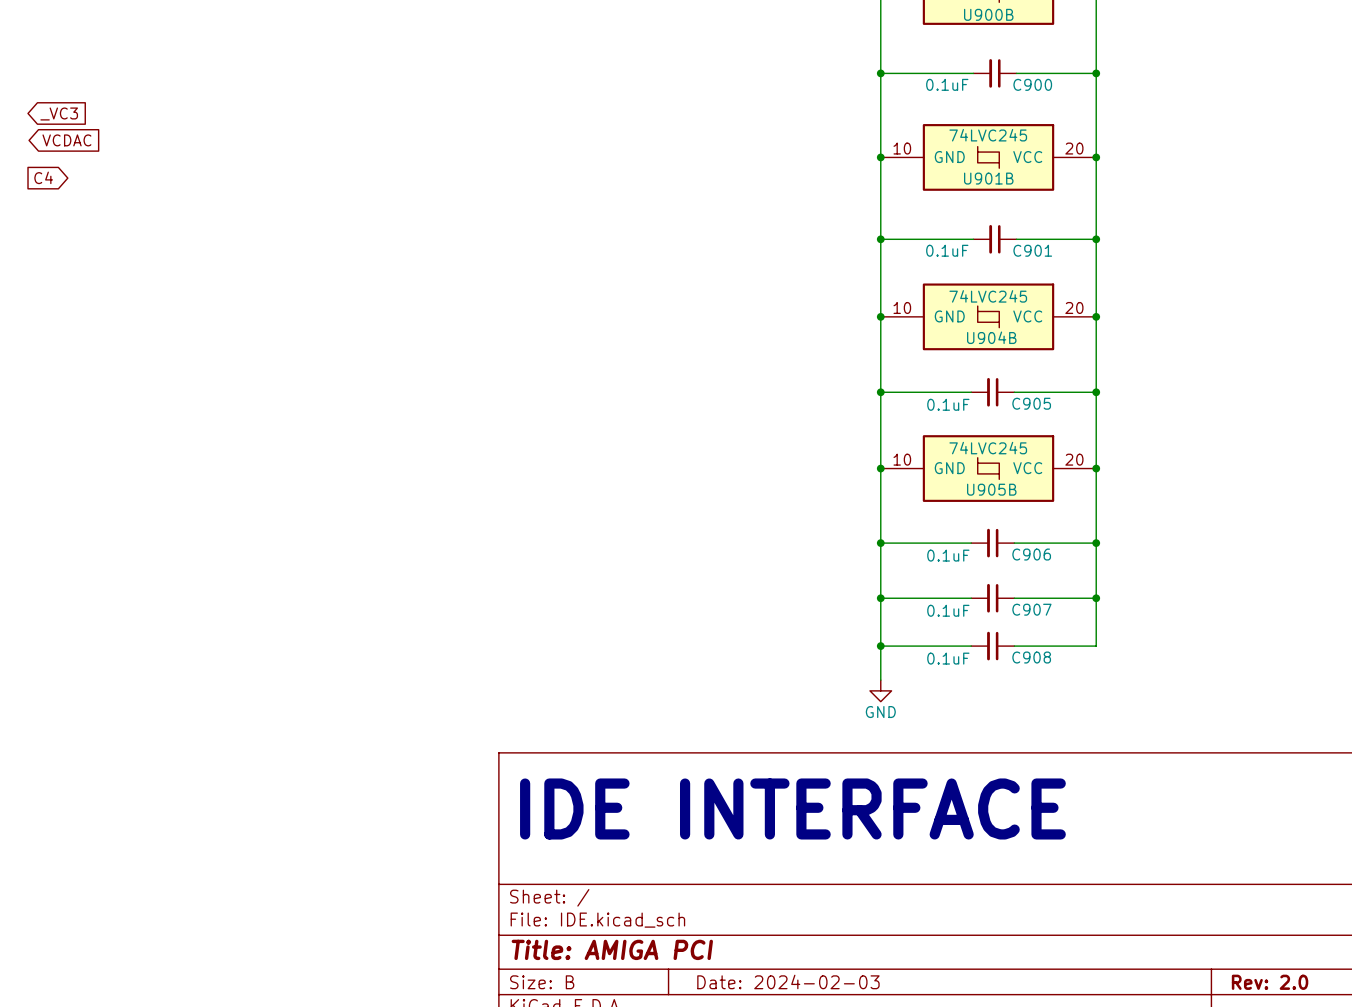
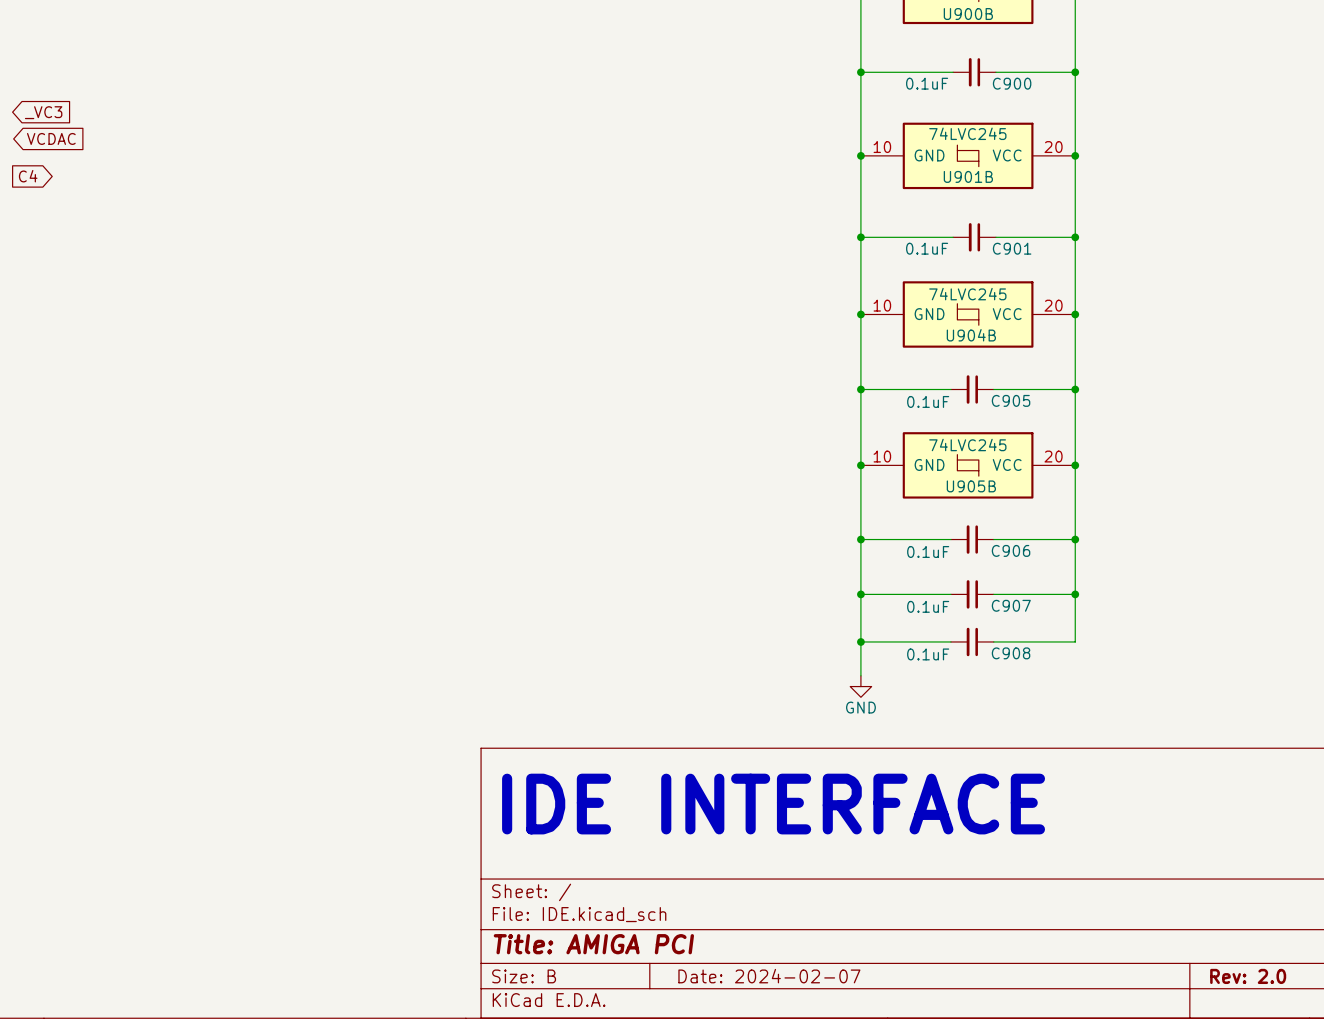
title block: Date: 2024-02-03 (788, 981) -> Date: 2024-02-07 (769, 976)

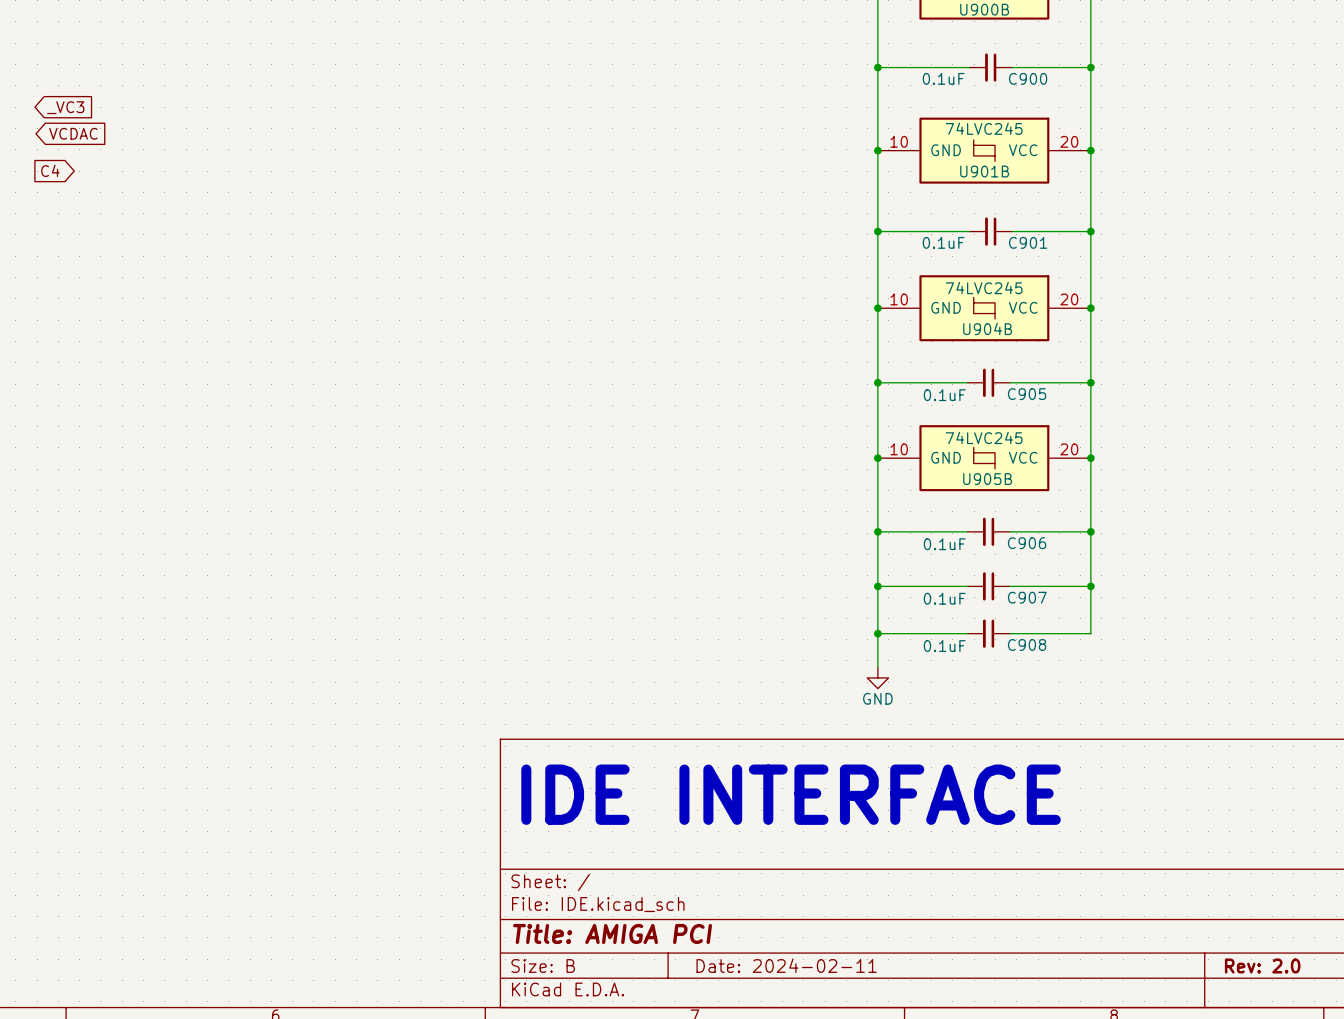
title block: Date: 2024-02-07 (769, 976) -> Date: 2024-02-11 (786, 965)

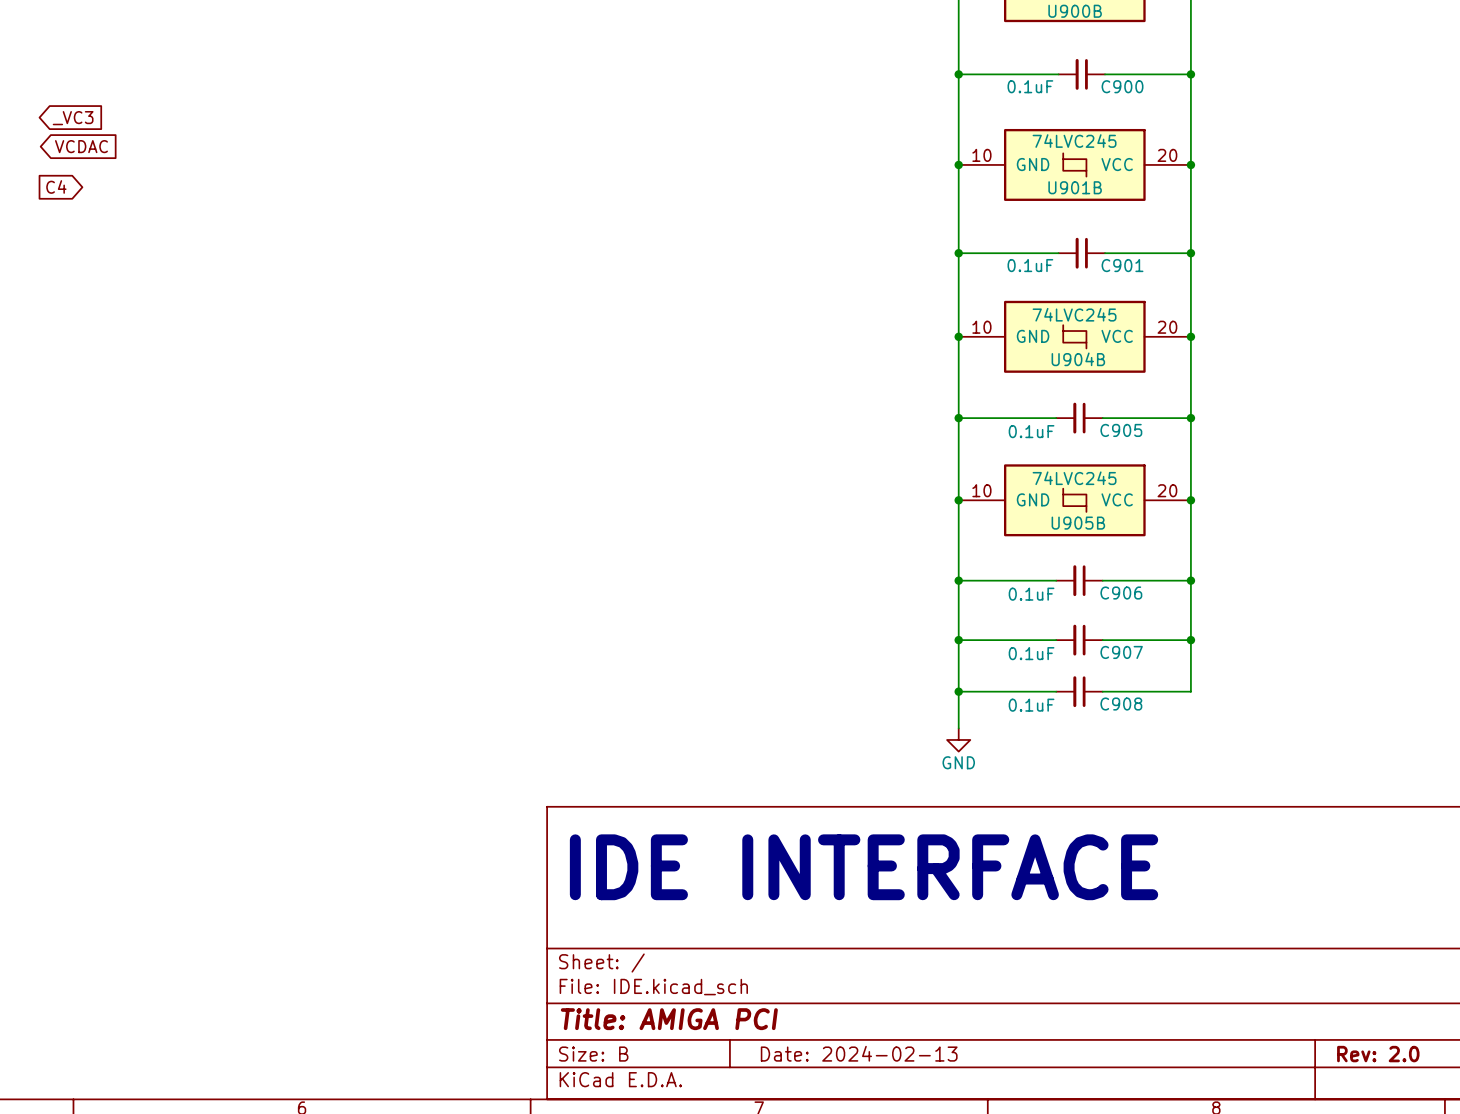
title block: Date: 2024-02-11 (786, 965) -> Date: 2024-02-13 (859, 1053)

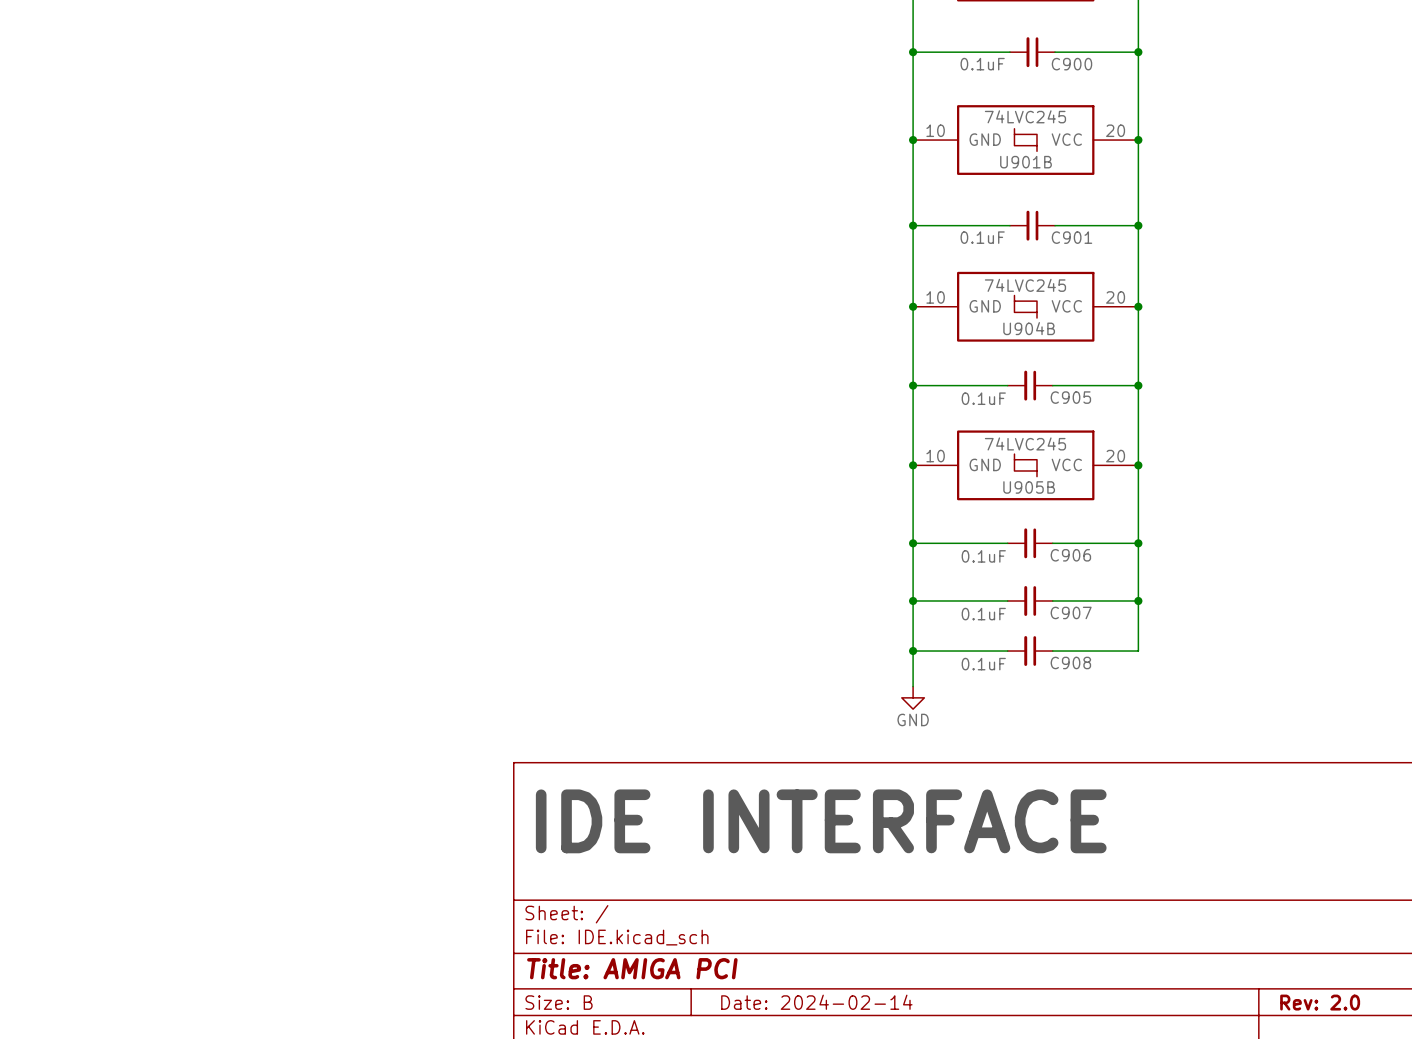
global label: _VC3 (73, 118) -> none
global label: VCDAC (81, 146) -> none
global label: C4 (56, 186) -> none
title block: Date: 2024-02-13 (859, 1053) -> Date: 2024-02-14 (816, 1002)

